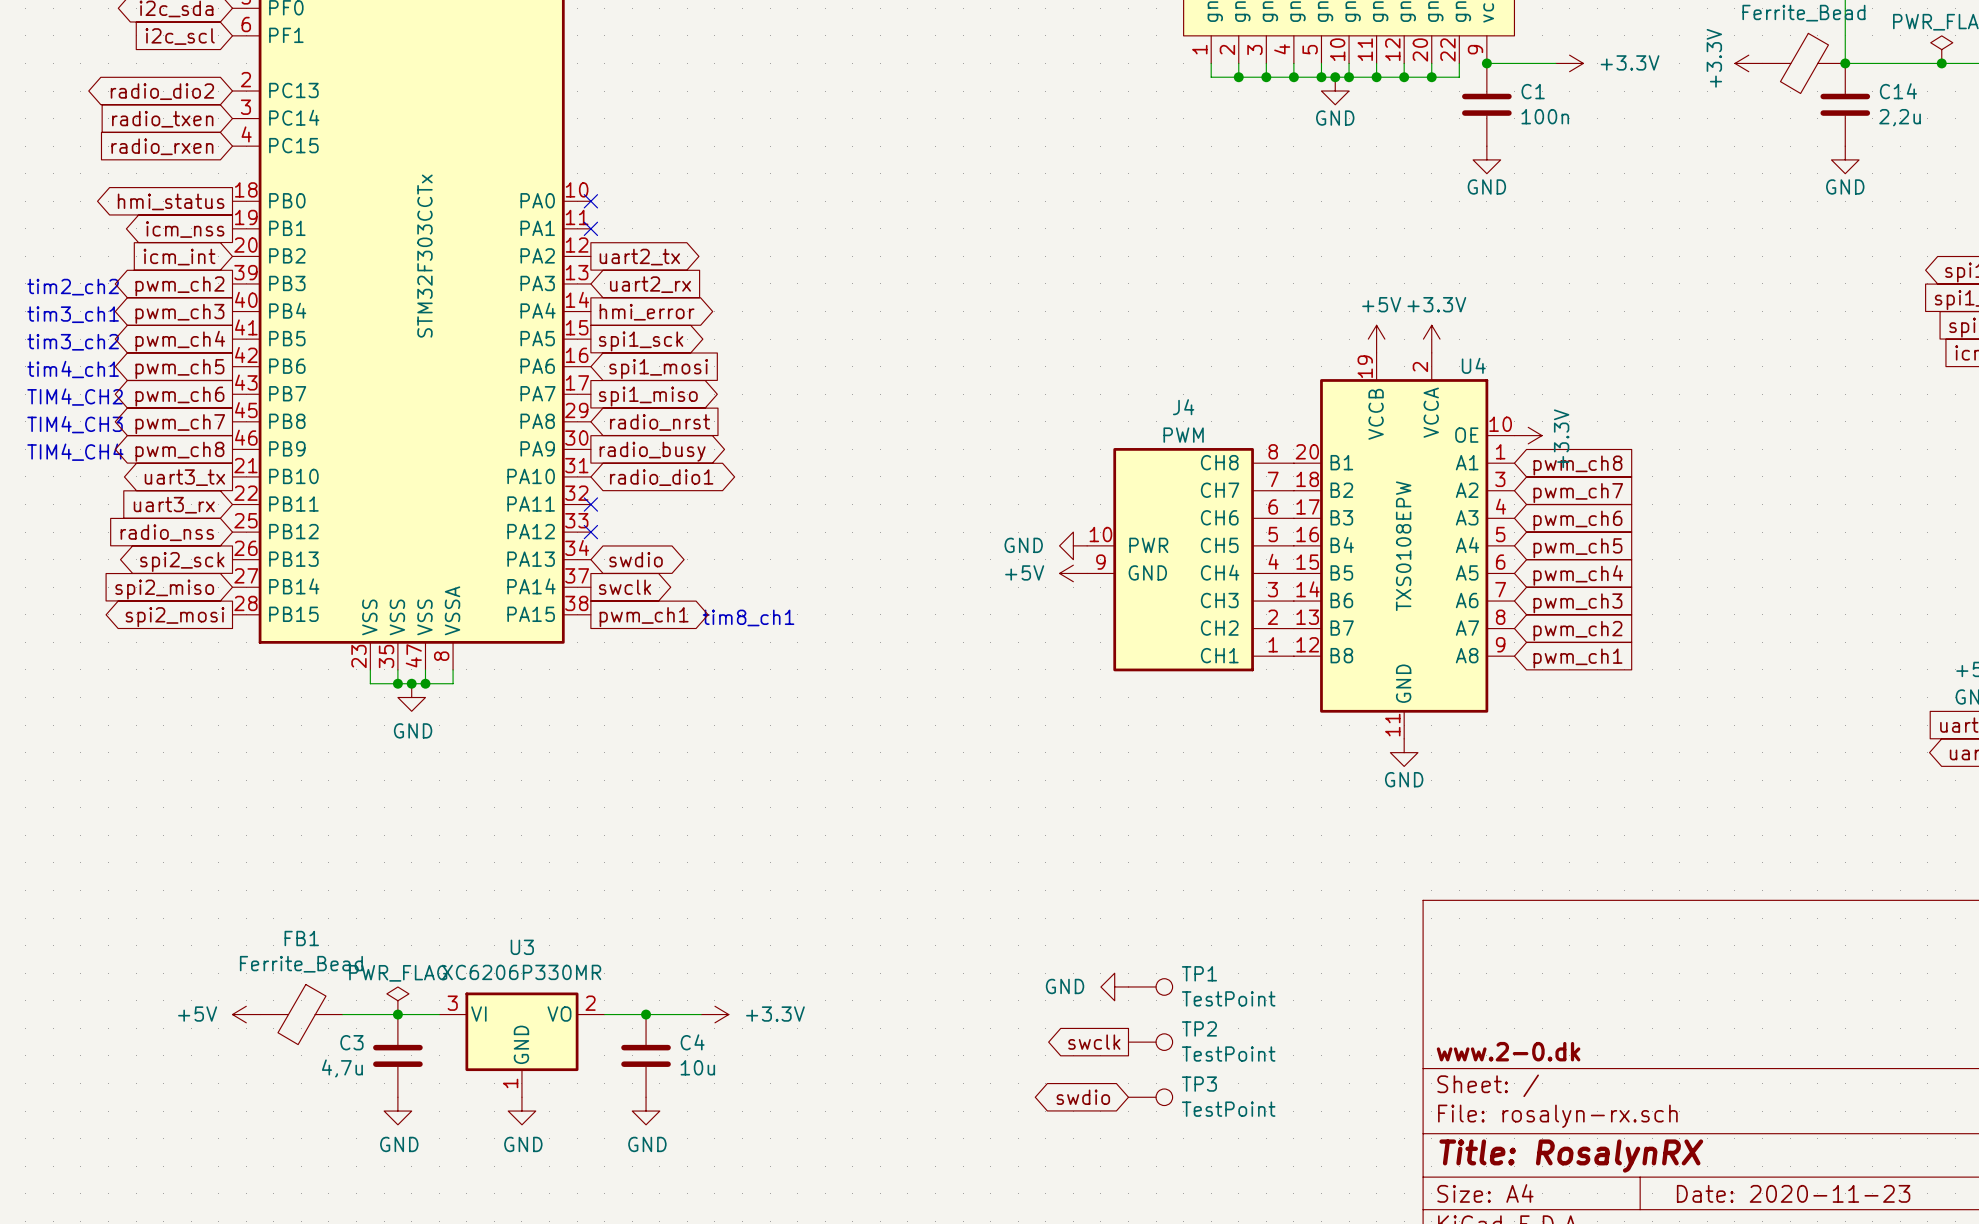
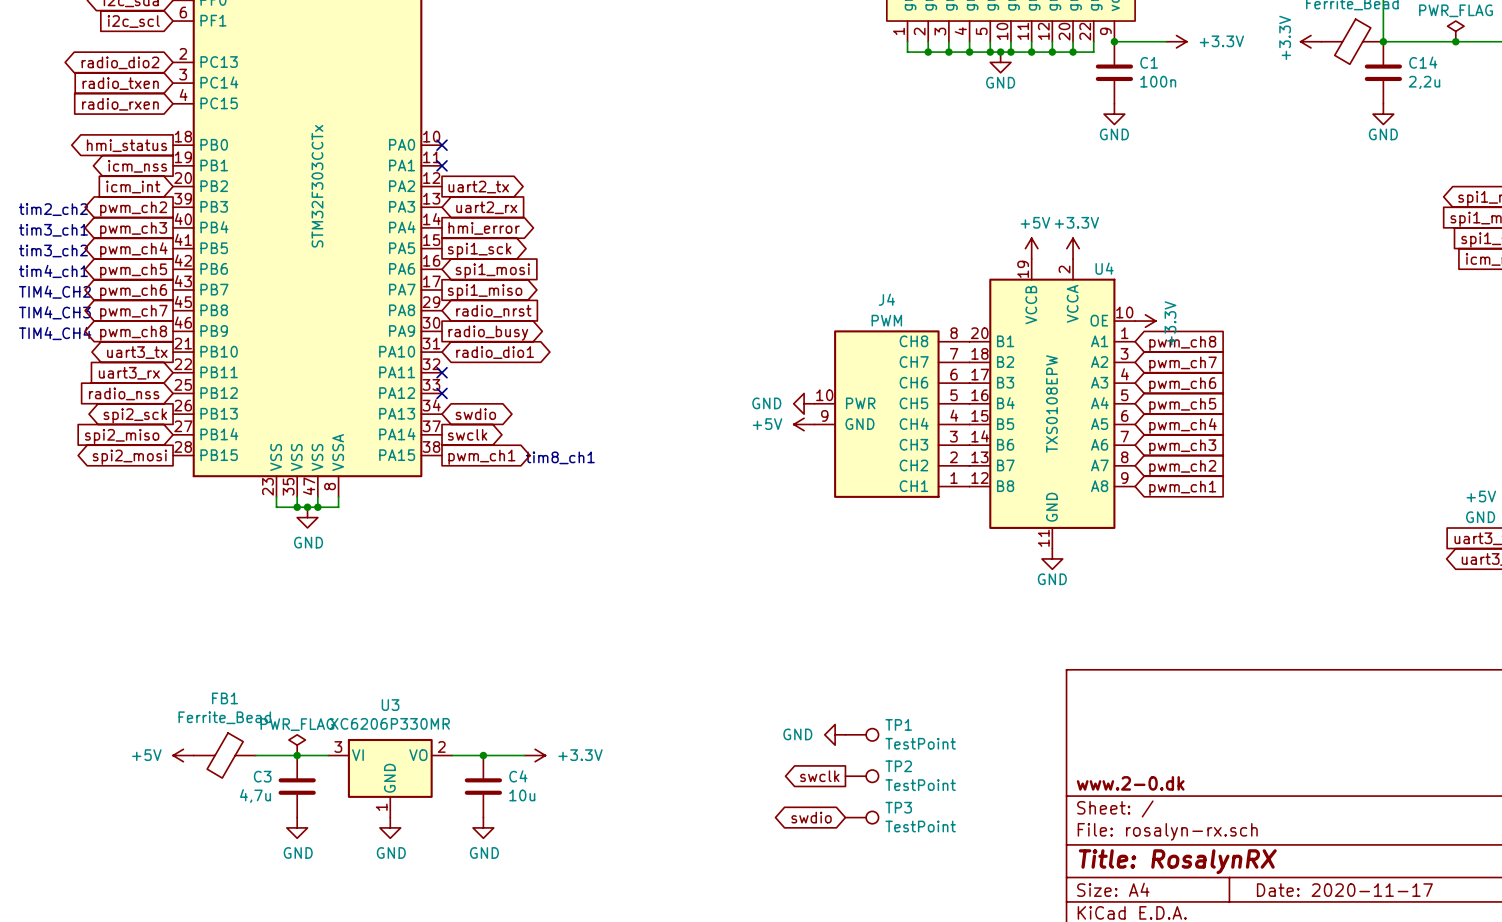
title block: Date: 2020-11-23 (1793, 1193) -> Date: 2020-11-17 (1344, 890)

